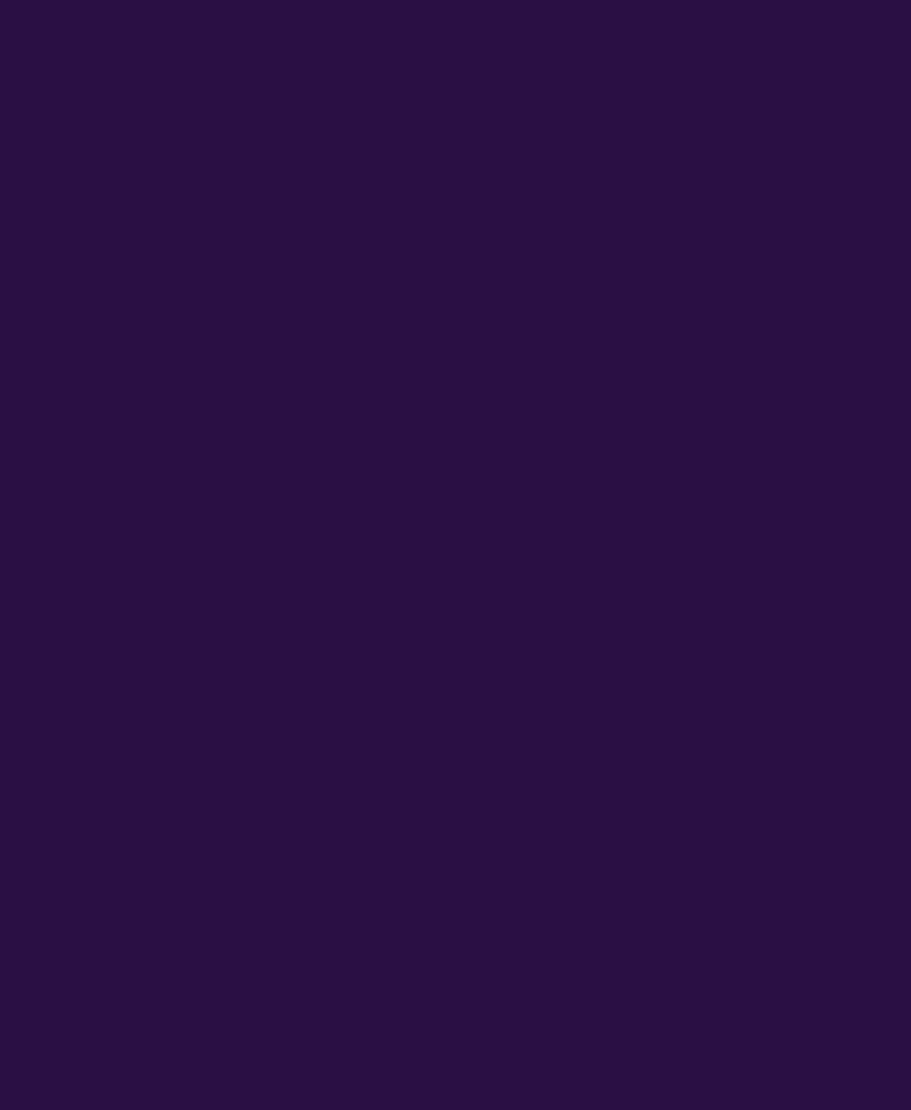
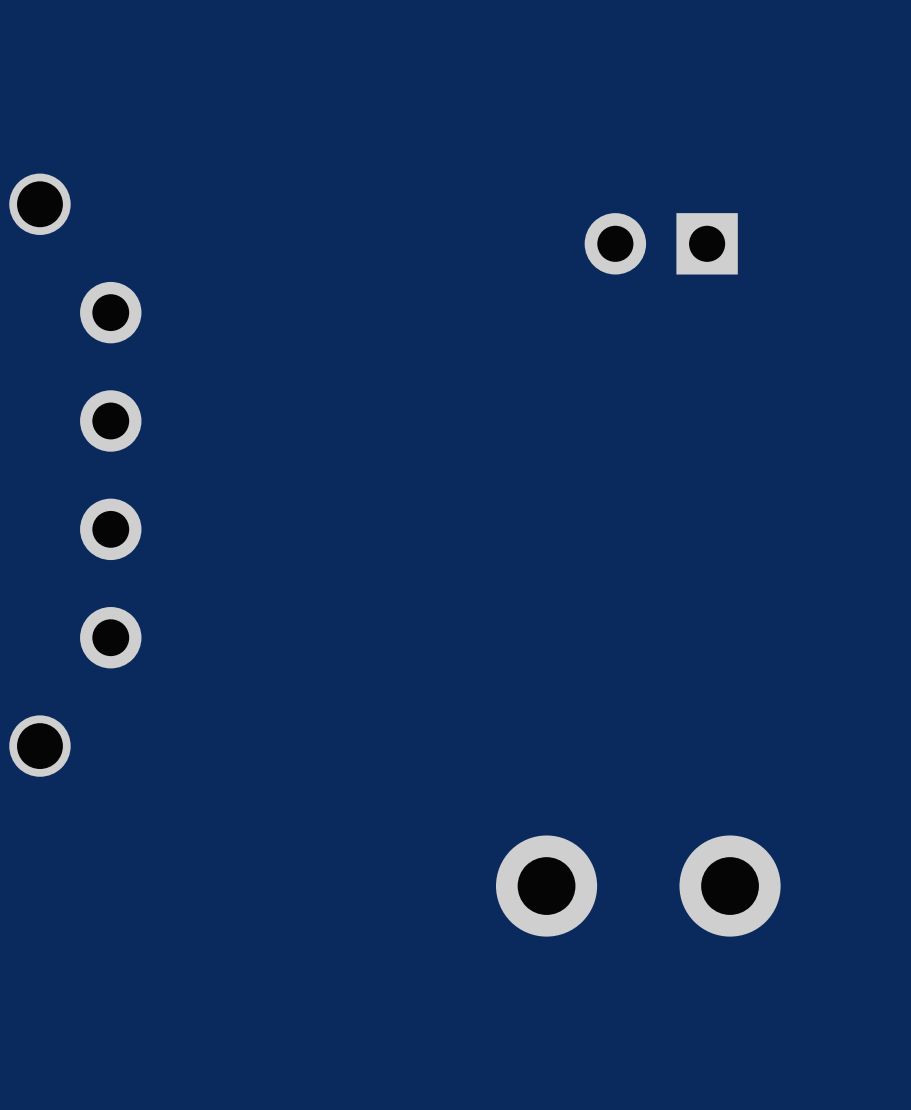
part: none -> (661, 243)
part: none -> (75, 475)
part: none -> (546, 886)
part: none -> (730, 886)

